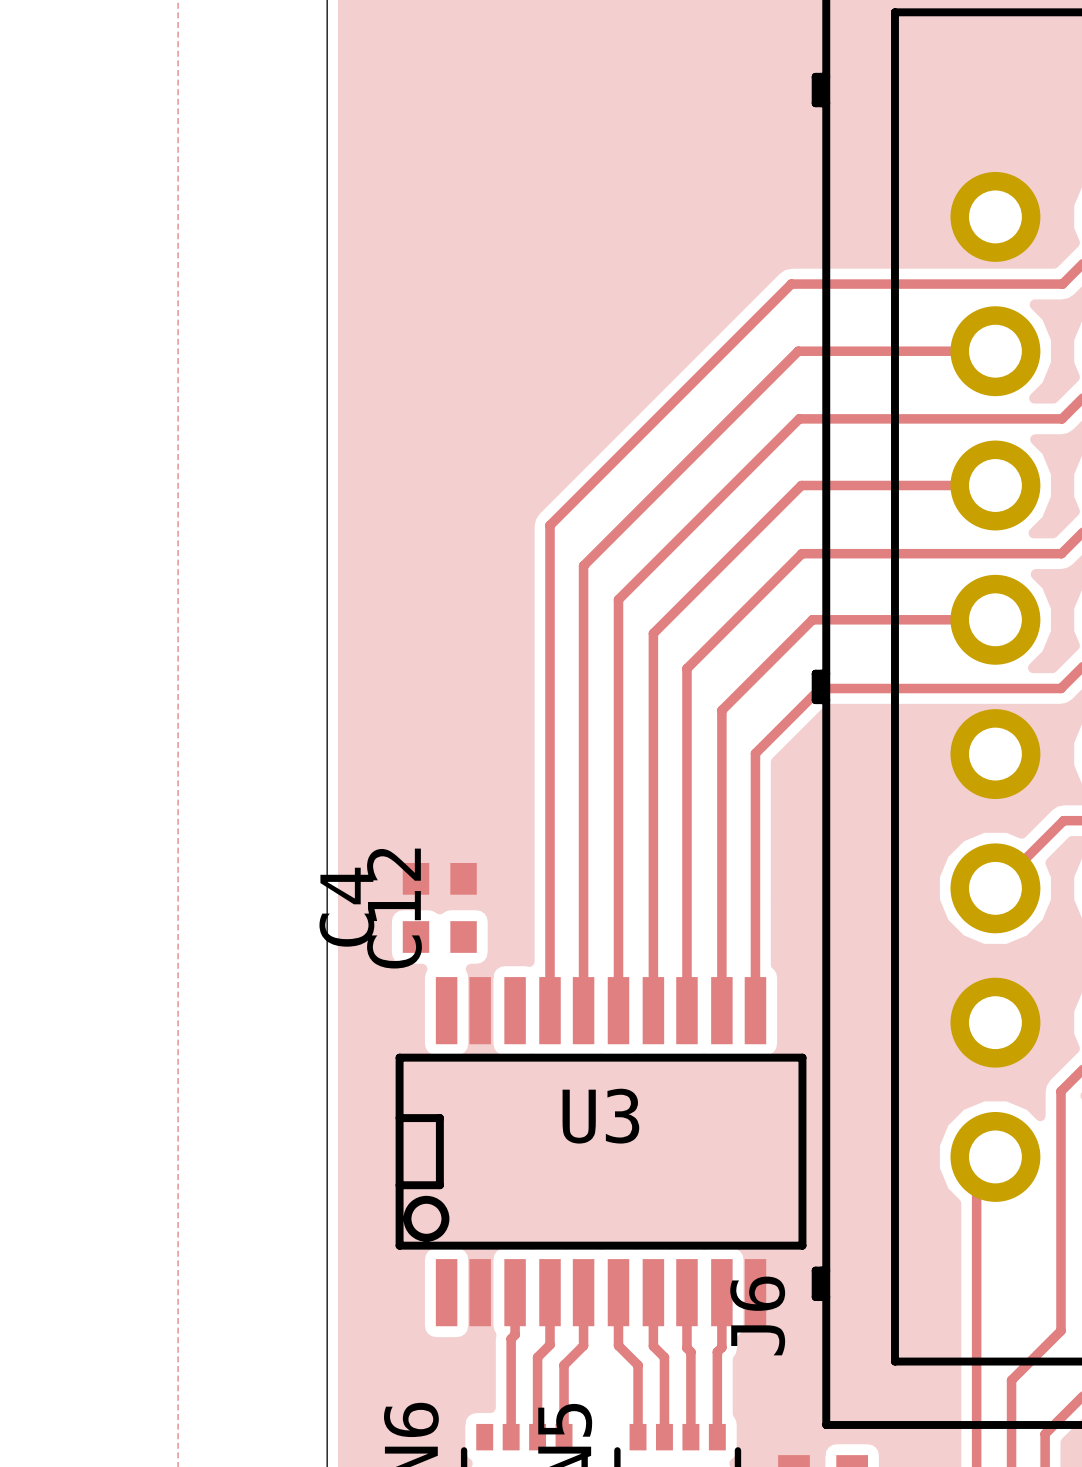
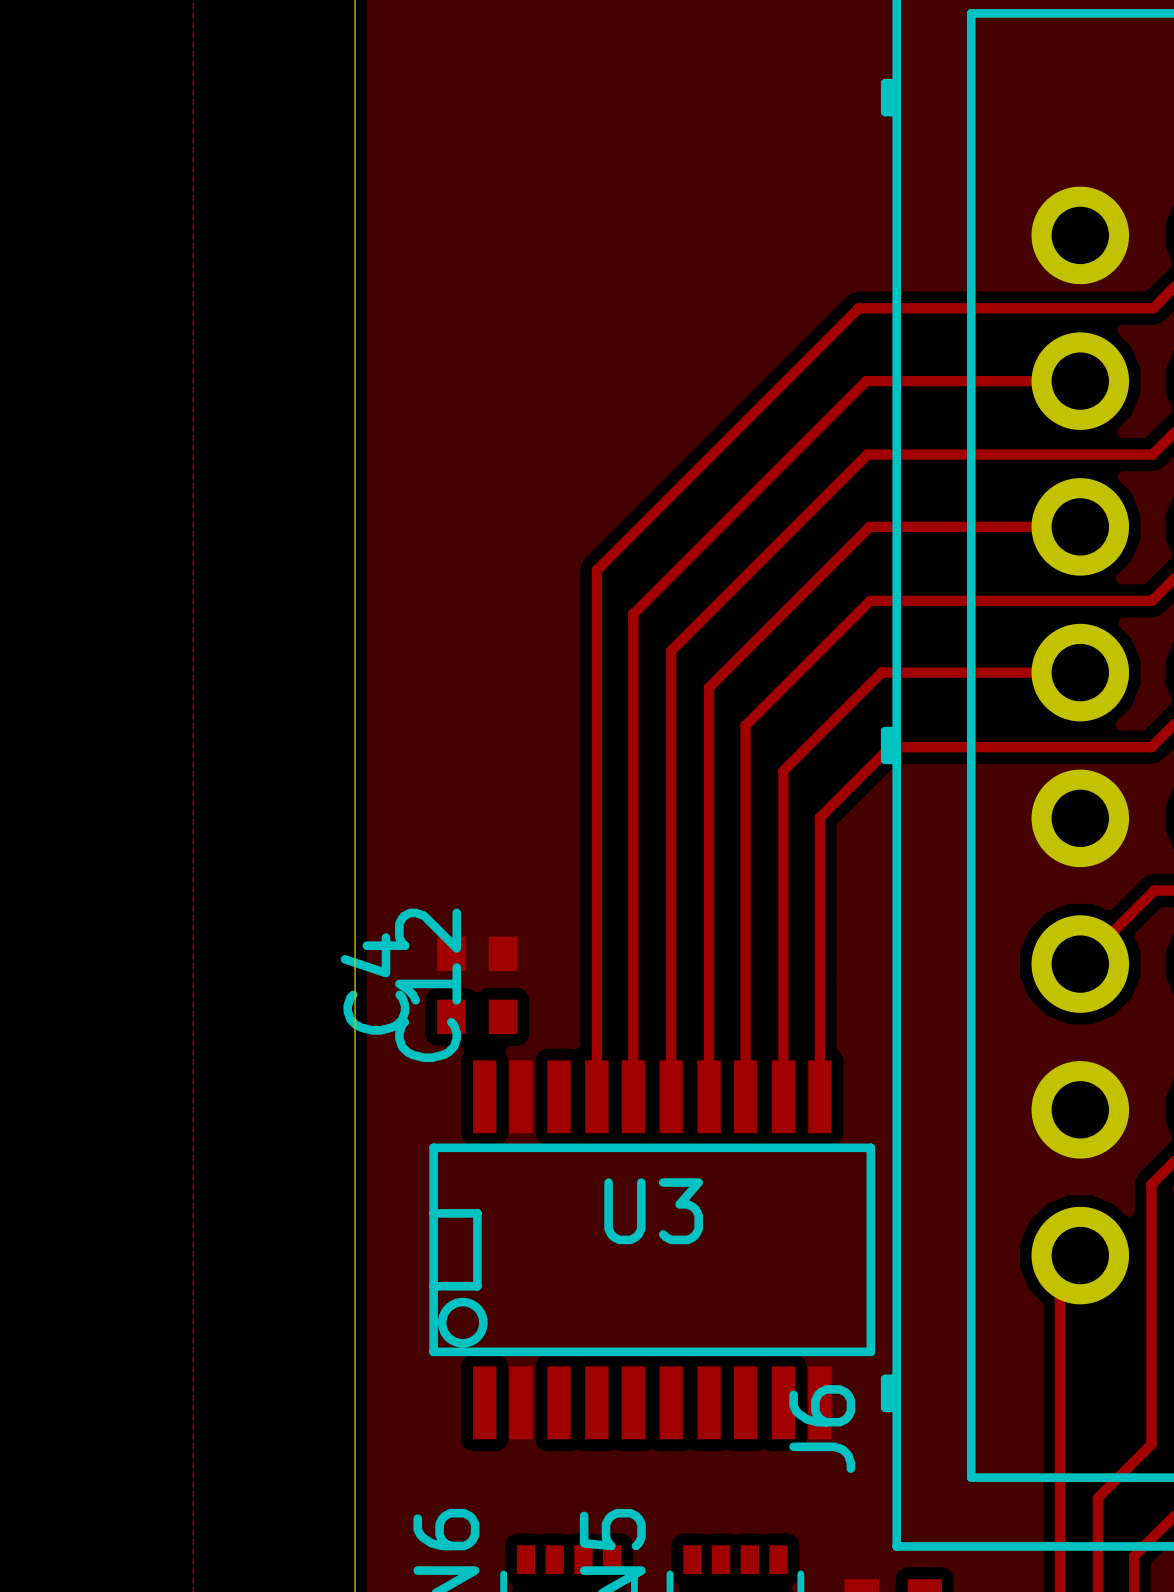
top track: (515, 1292) (515, 1334) (511, 1338) (511, 1437) -> none
top track: (550, 1292) (550, 1344) (537, 1357) (537, 1437) -> none
top track: (583, 1292) (583, 1345) (564, 1365) (564, 1437) -> none
top track: (618, 1292) (618, 1345) (638, 1365) (638, 1437) -> none
top track: (653, 1292) (653, 1346) (664, 1357) (664, 1437) -> none
top track: (686, 1292) (686, 1348) (690, 1352) (690, 1437) -> none
top track: (721, 1292) (721, 1347) (717, 1352) (717, 1437) -> none

